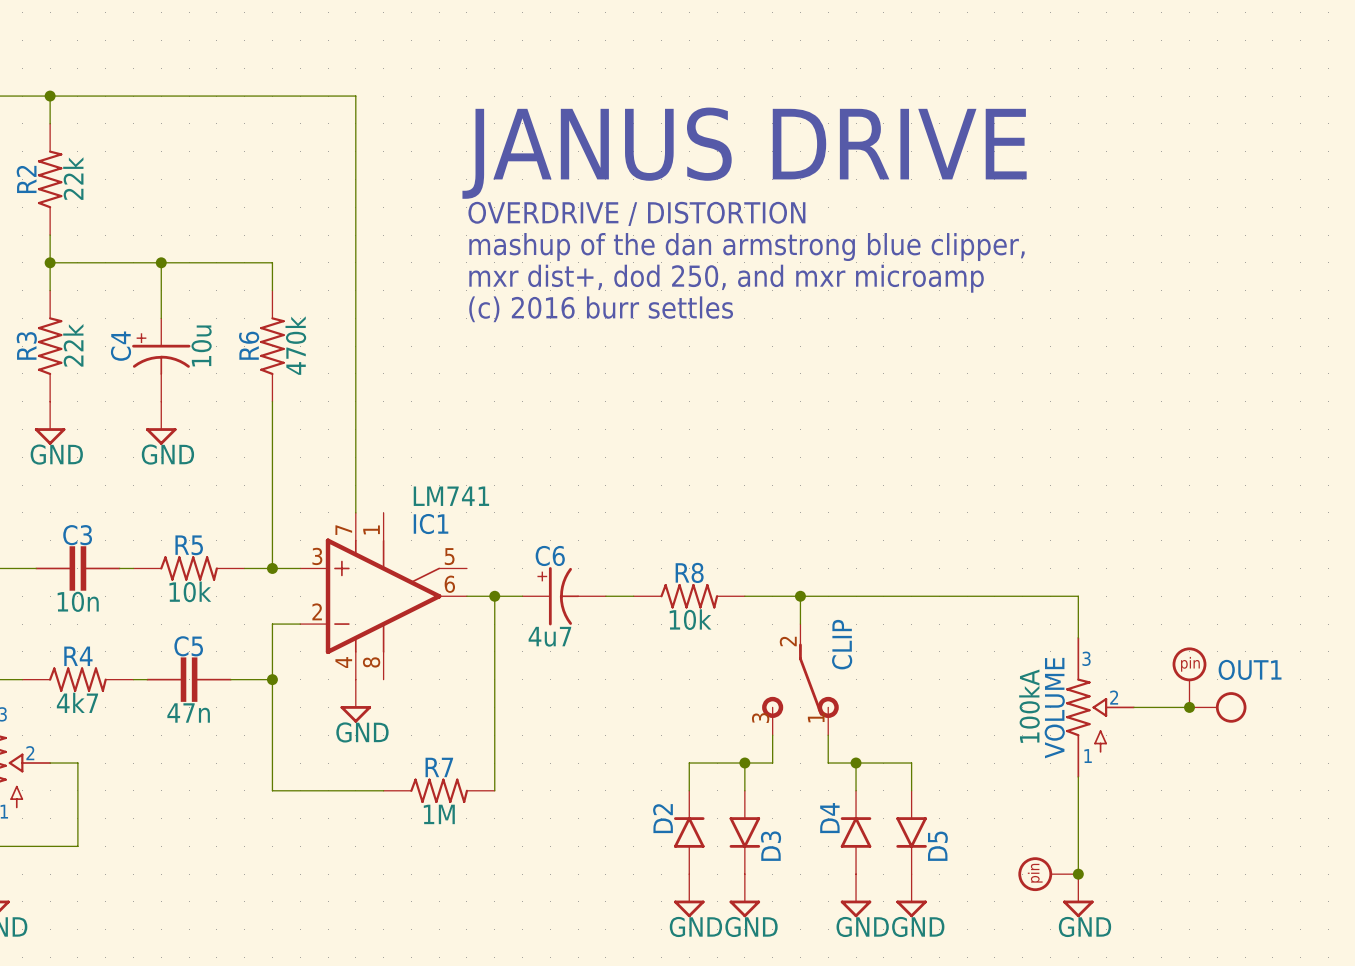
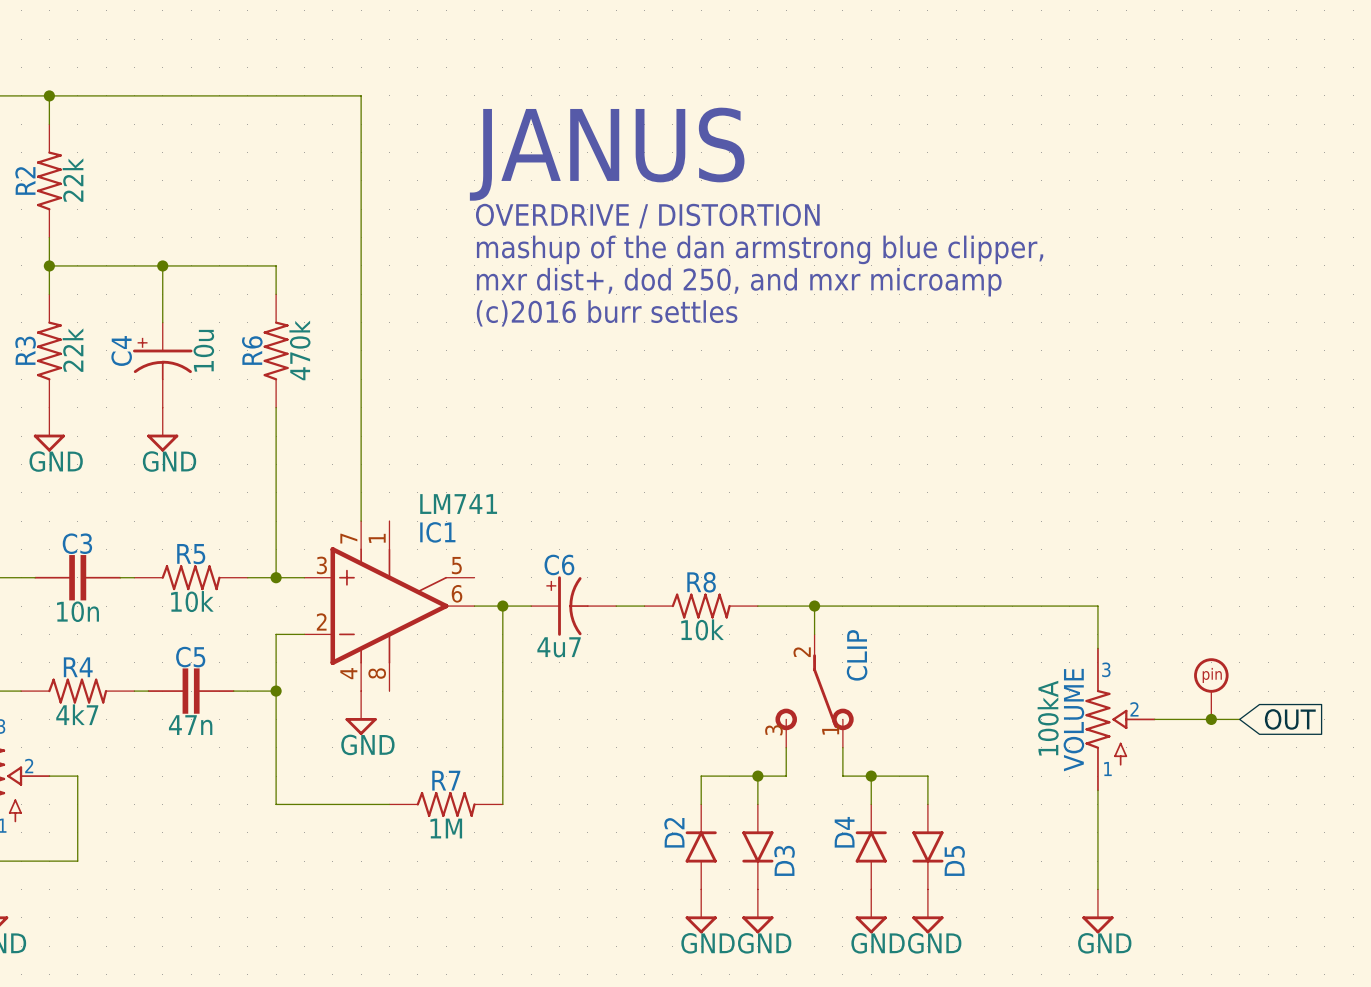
text: JANUS DRIVE (744, 153) -> JANUS (607, 154)
text: (c) 2016 burr settles (601, 309) -> (c)2016 burr settles (607, 313)
OUT1: (1217, 707) -> none
global label: none -> OUT (1290, 719)
part: (1048, 874) -> none
junction: (1078, 874) -> none

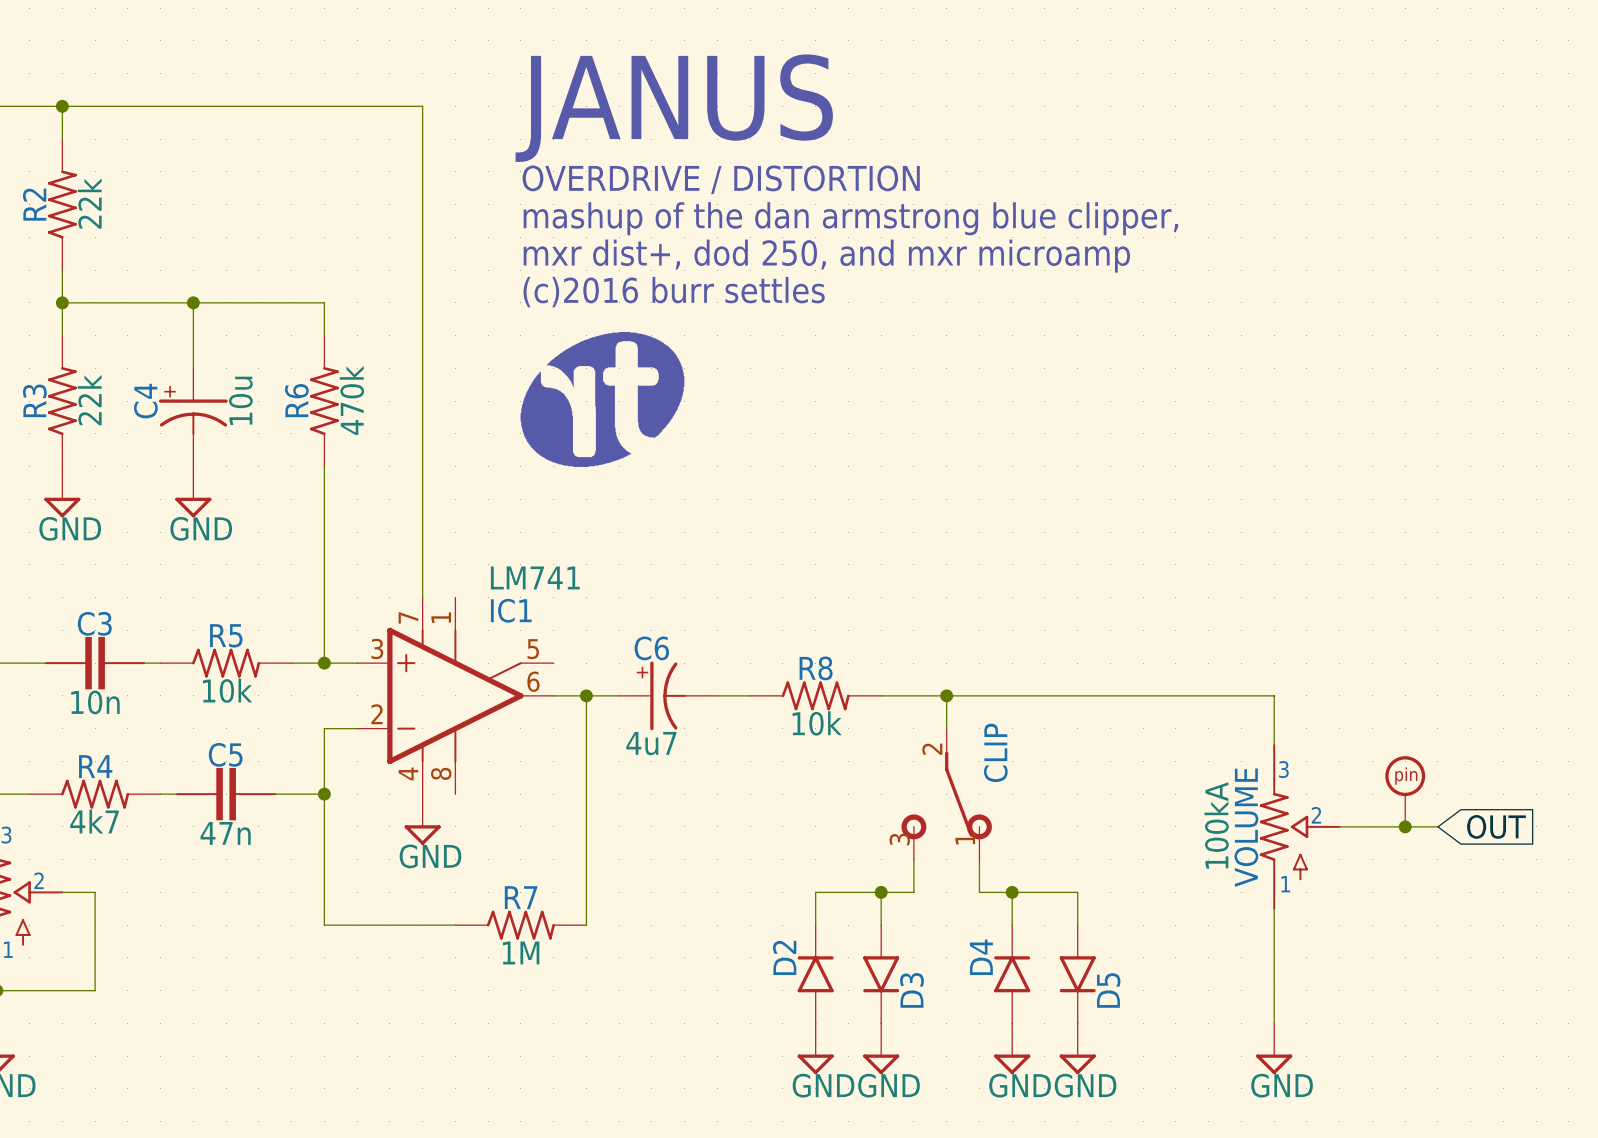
text position: JANUS (607, 154) -> JANUS (674, 108)
text position: OVERDRIVE / DISTORTION (647, 216) -> OVERDRIVE / DISTORTION (721, 179)
text position: mashup of the dan armstrong blue clipper, (760, 249) -> mashup of the dan armstrong blue clipper, (850, 218)
text position: mxr dist+, dod 250, and mxr microamp (739, 282) -> mxr dist+, dod 250, and mxr microamp (826, 256)
text position: (c)2016 burr settles (607, 313) -> (c)2016 burr settles (674, 292)
part: none -> (602, 399)

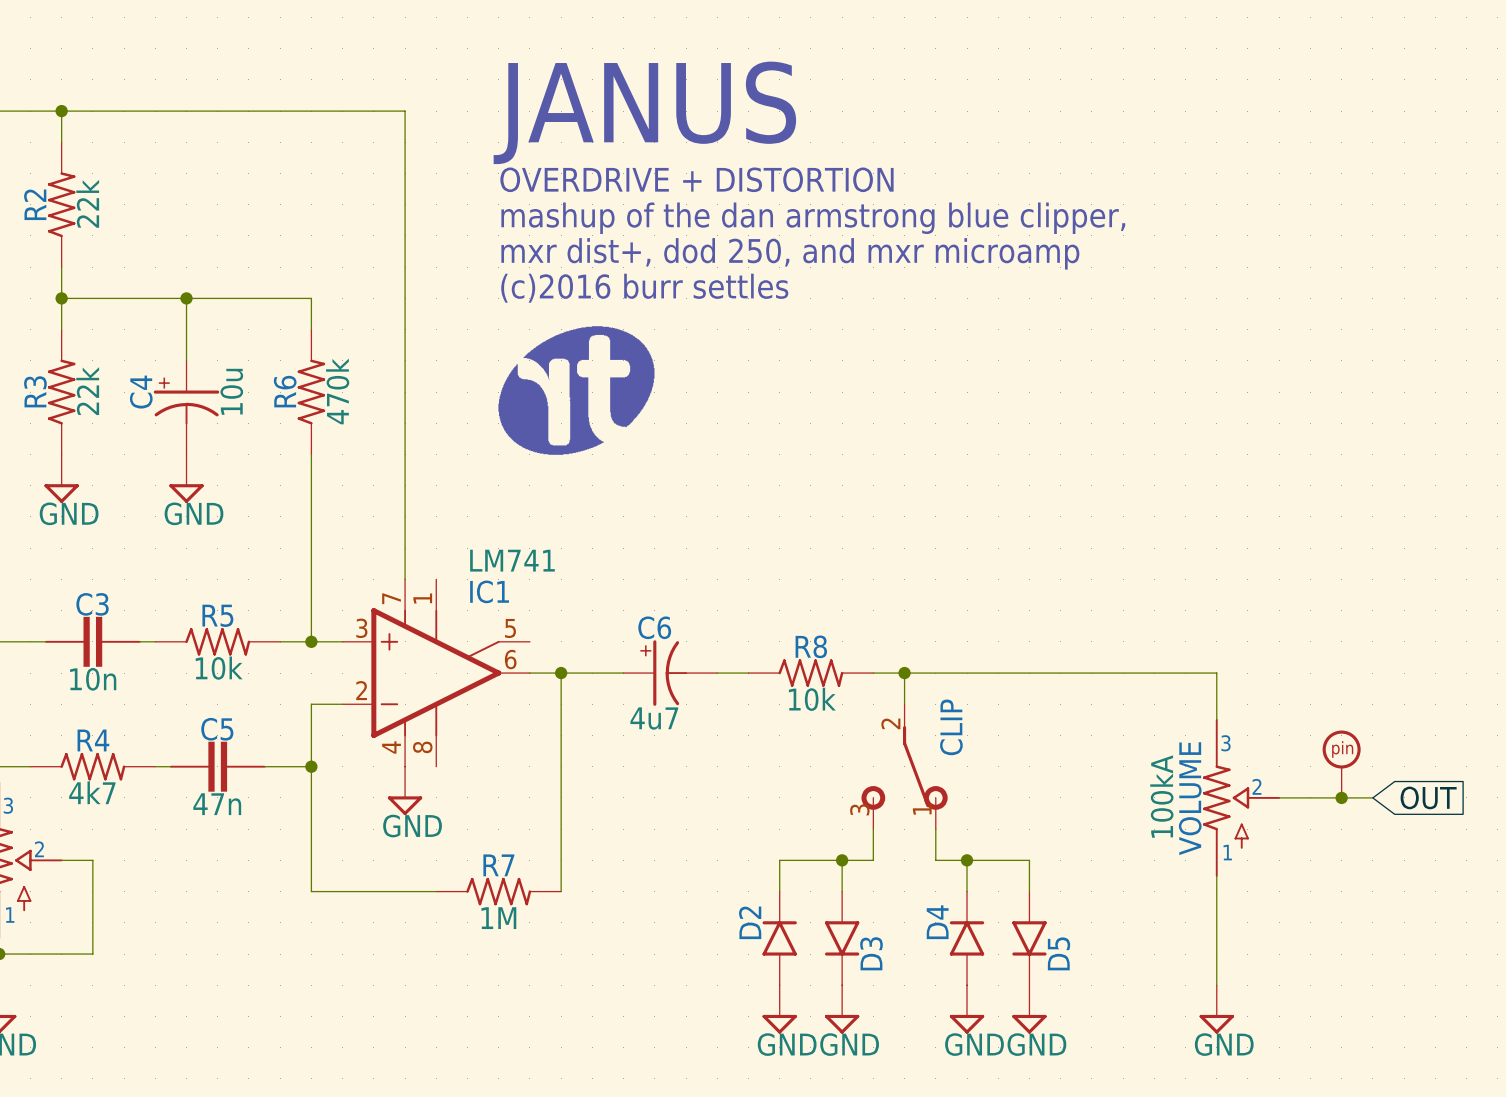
text: OVERDRIVE / DISTORTION (721, 179) -> OVERDRIVE + DISTORTION (696, 179)
C6 position: (668, 695) -> (670, 673)
R8 position: (815, 695) -> (810, 673)

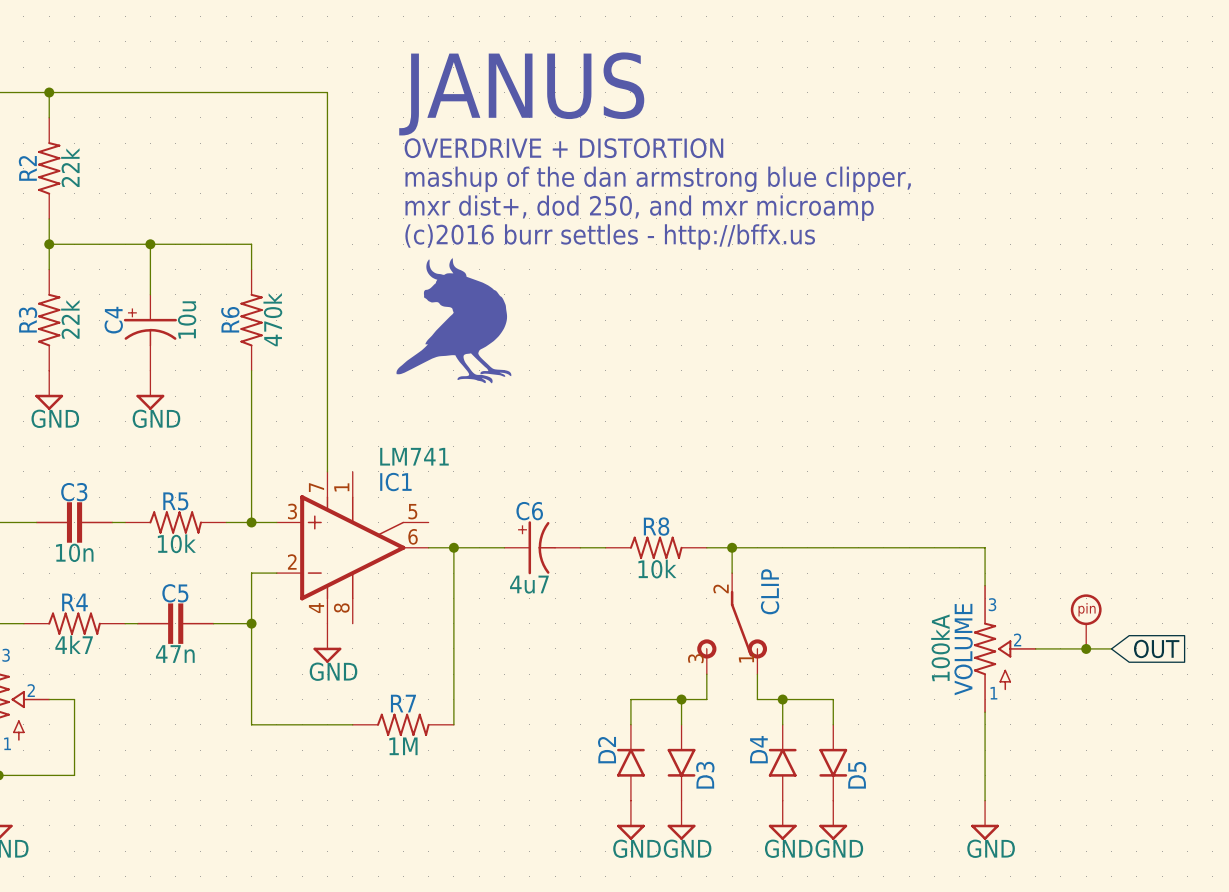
text: (c)2016 burr settles (644, 288) -> (c)2016 burr settles - http://bffx.us (610, 237)
part: (576, 390) -> none
part: none -> (453, 320)

